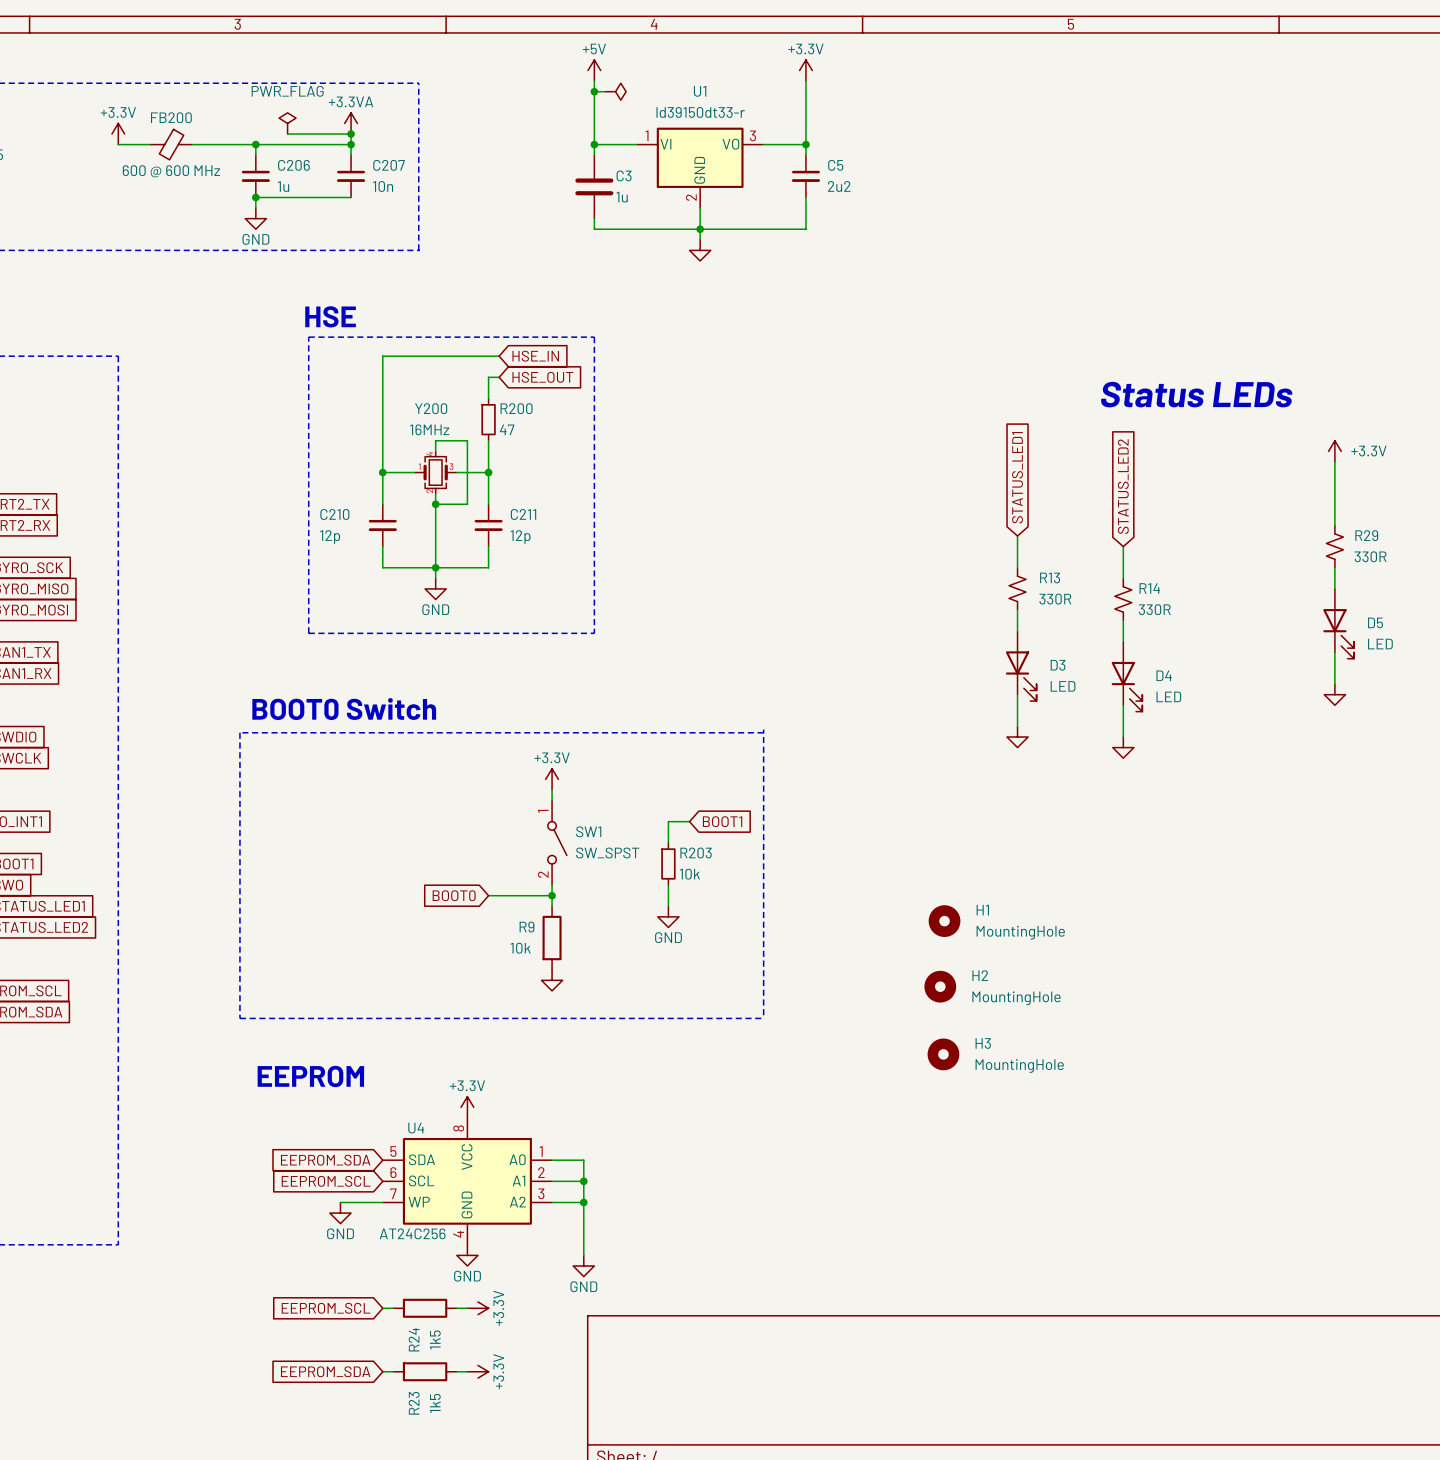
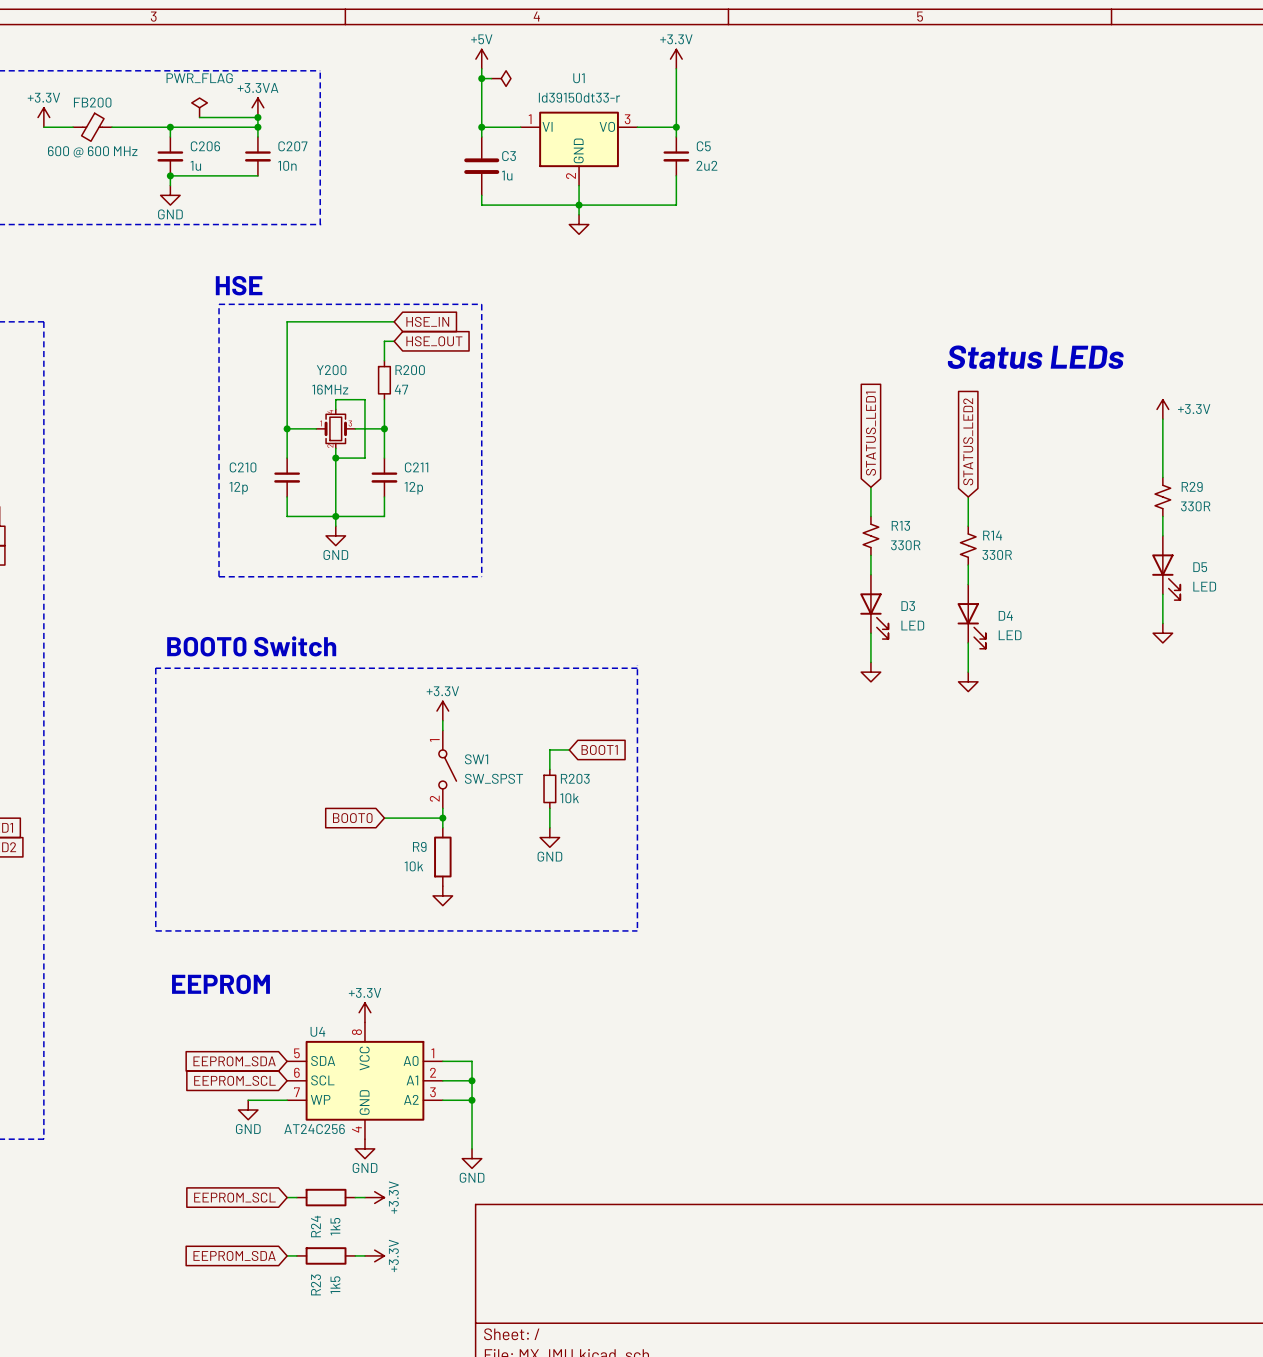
H1: MountingHole (944, 921) -> none
H2: MountingHole (940, 986) -> none
H3: MountingHole (943, 1054) -> none

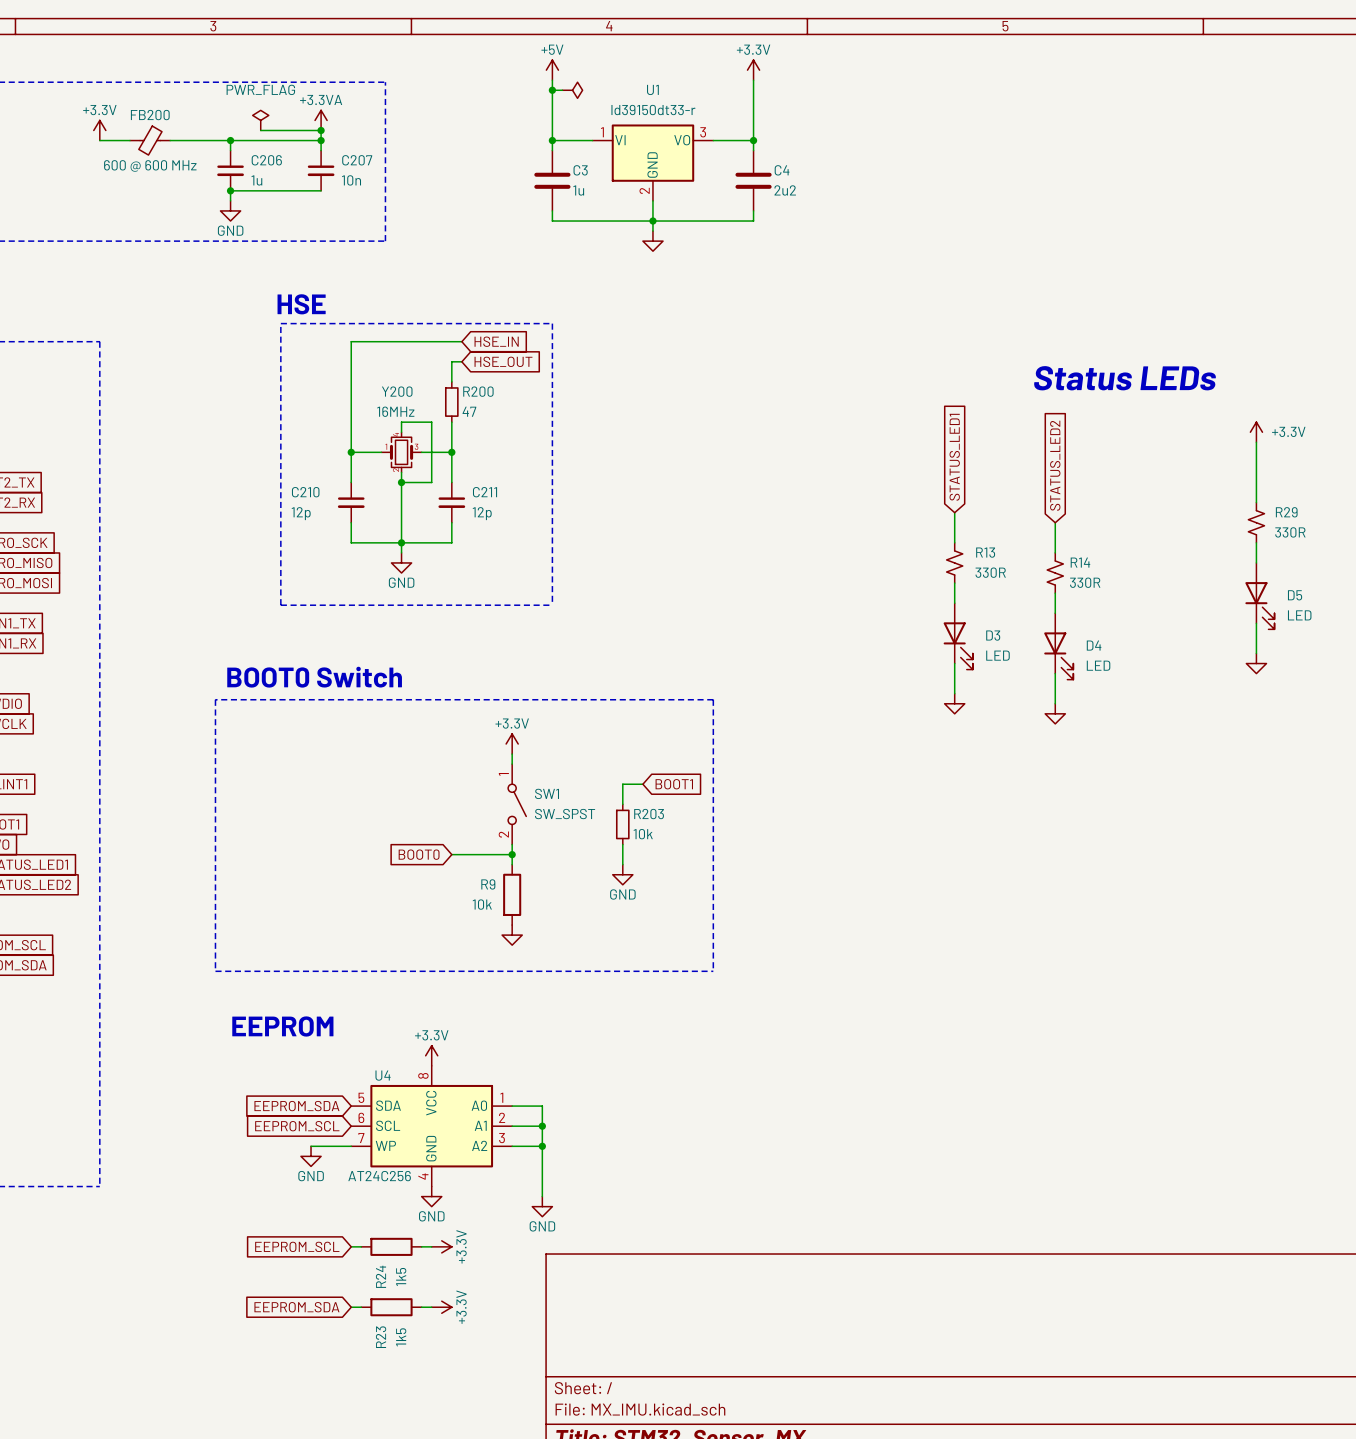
C5: 2u2 (676, 156) -> none
C4: none -> 2u2 (753, 180)

